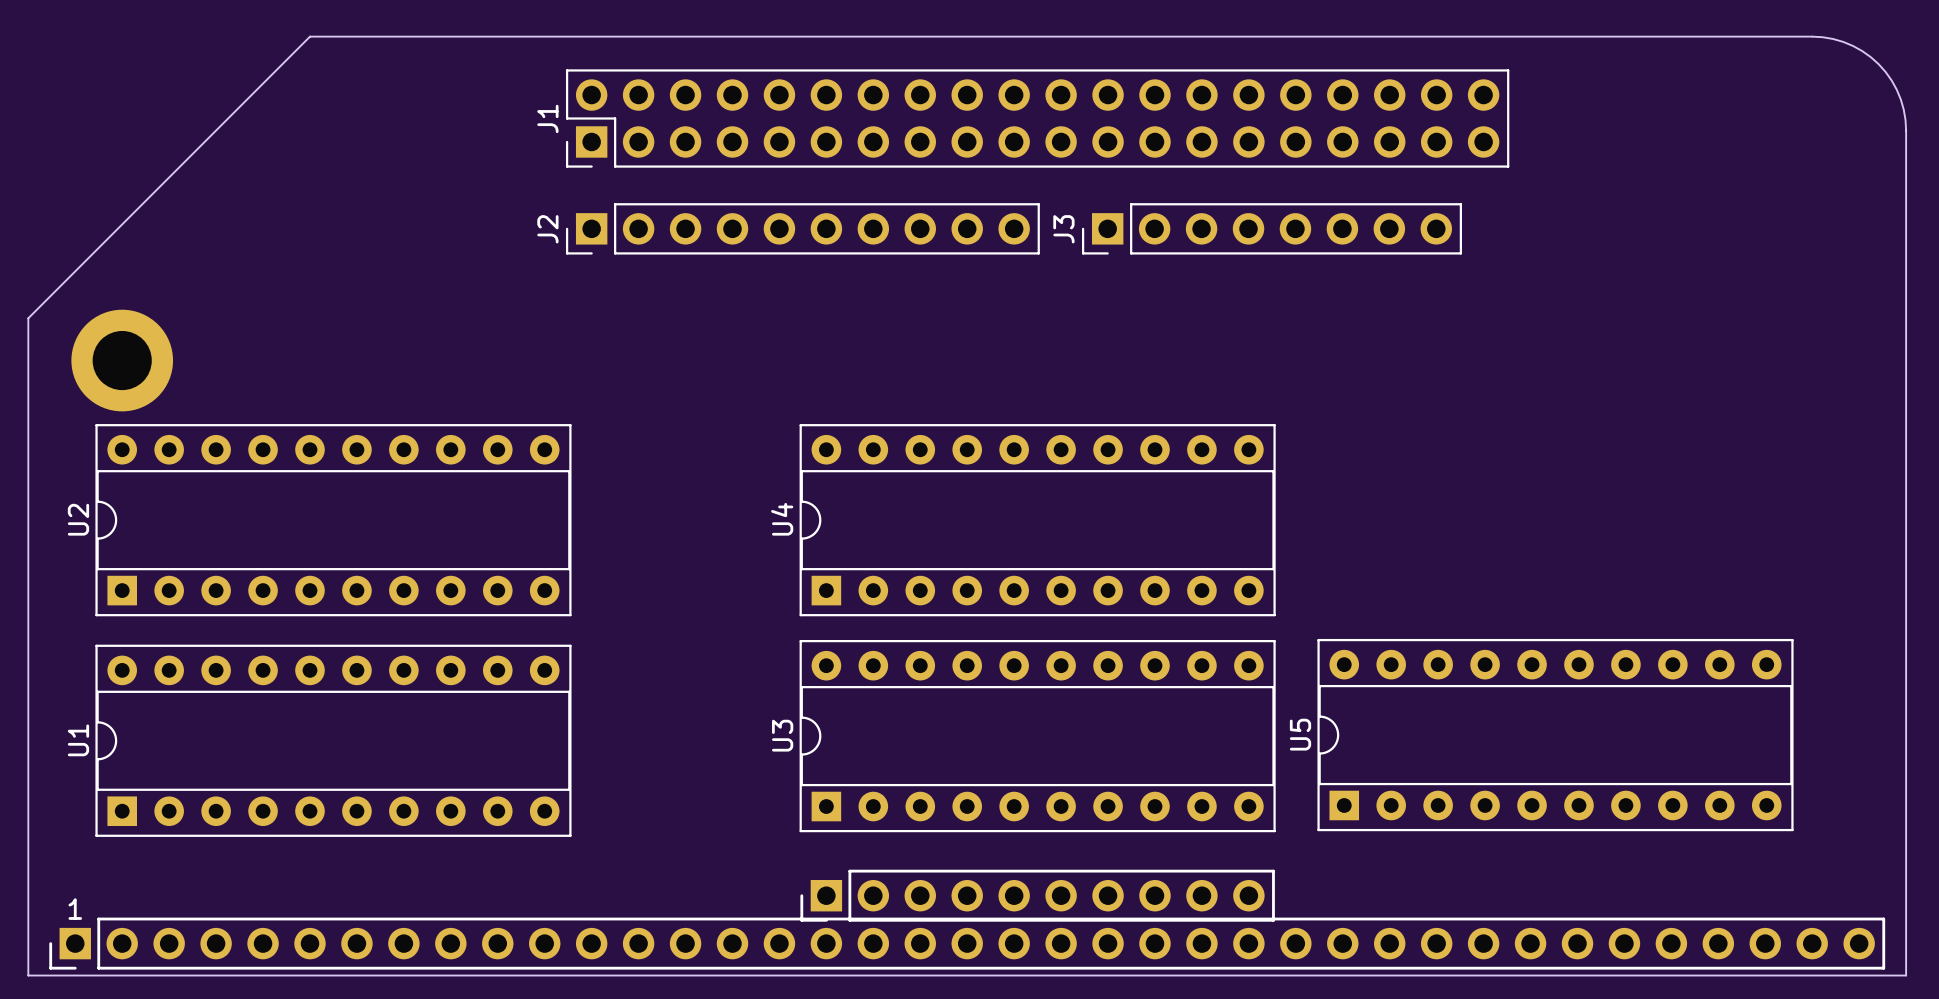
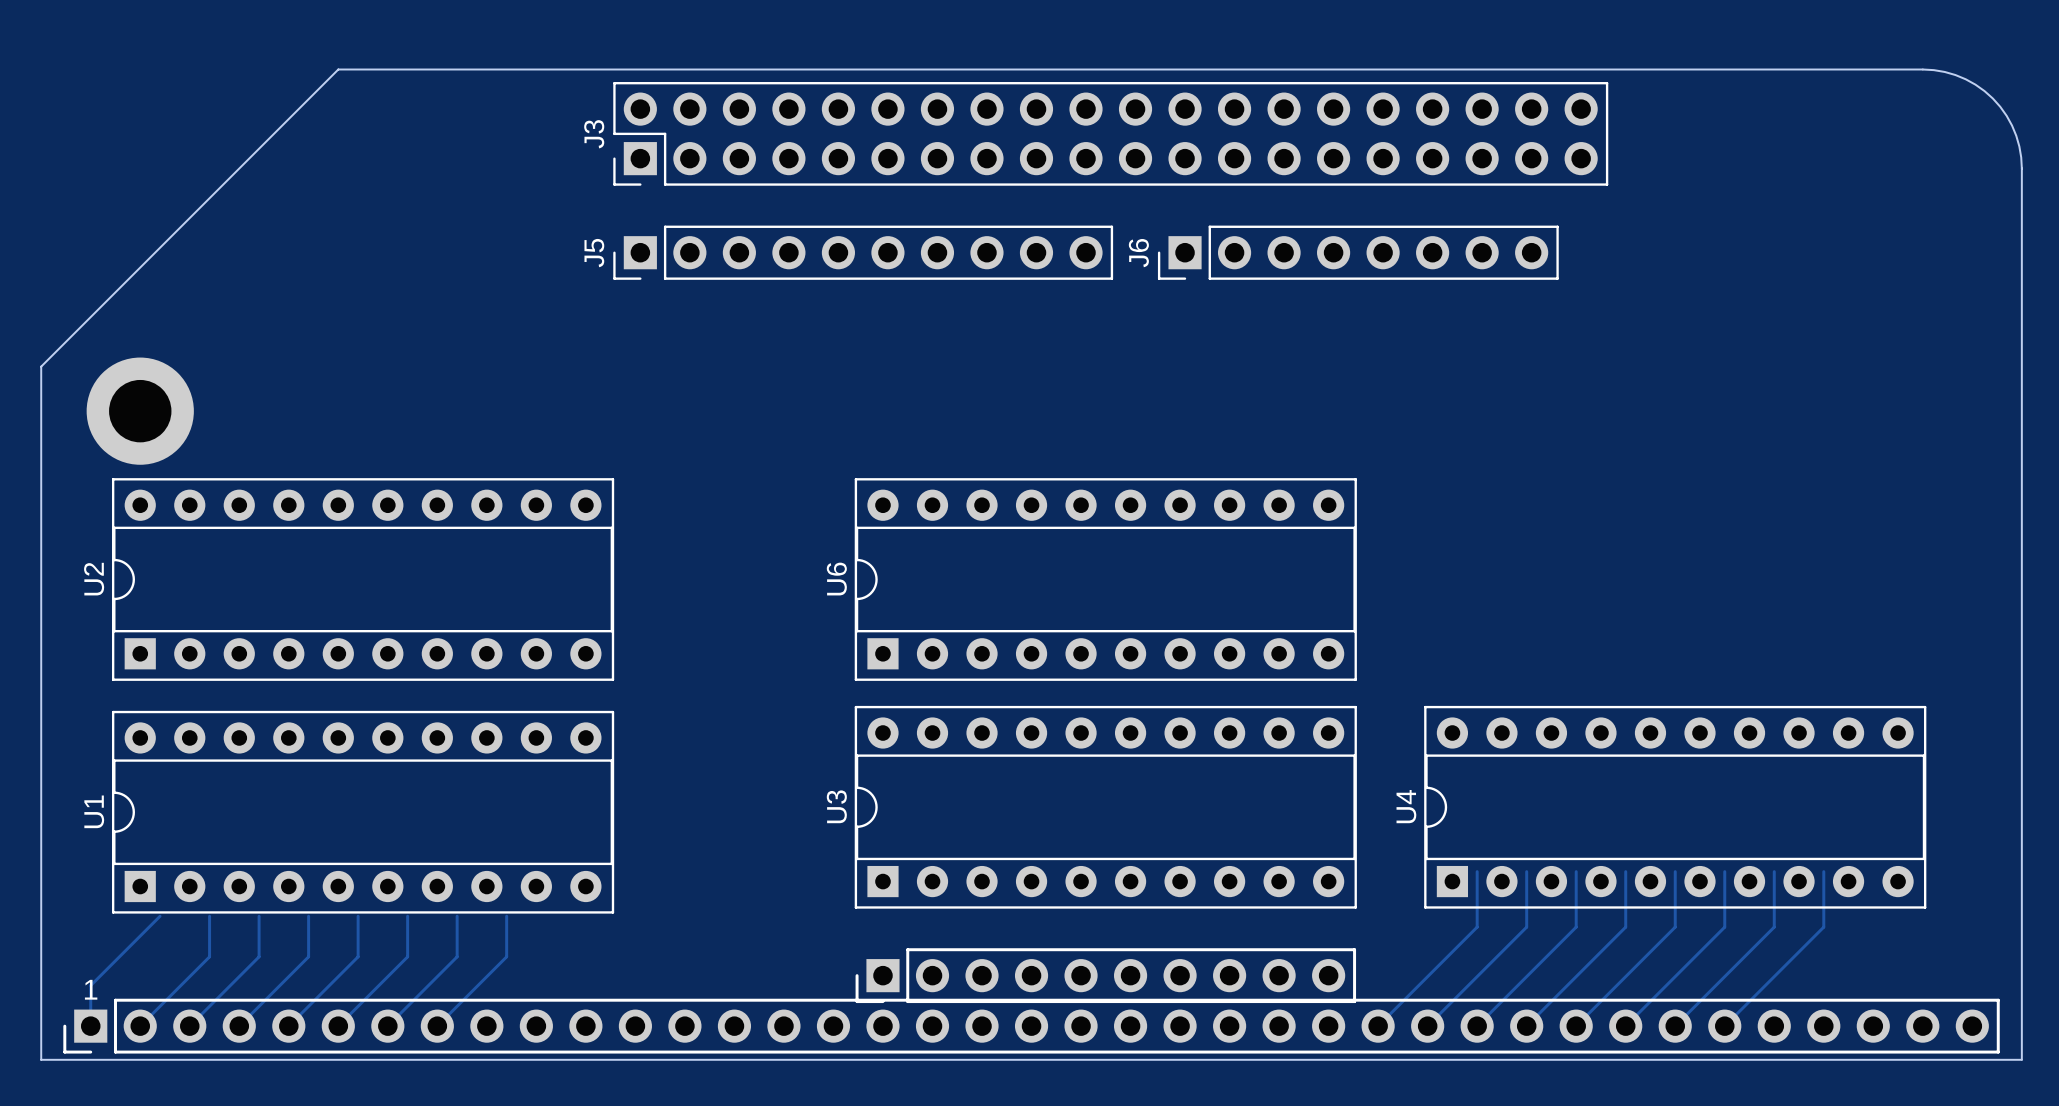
J1: (1037, 118) -> none
J3 footprint: [1081, 203, 1462, 255] -> [613, 82, 1609, 186]
J5: none -> (863, 252)
J6: none -> (1358, 252)
J2: (802, 228) -> none
J3 name position: J3 (1063, 229) -> J3 (594, 134)
U4 name: U4 (782, 519) -> U6 (836, 579)
U5: (1555, 735) -> none
U4: none -> (1675, 807)
track: none -> (1477, 871) (1477, 927) (1378, 1026)
track: none -> (1526, 871) (1526, 927) (1427, 1026)
track: none -> (1576, 871) (1576, 927) (1477, 1026)
track: none -> (1625, 871) (1625, 927) (1526, 1026)
track: none -> (1675, 871) (1675, 927) (1576, 1026)
track: none -> (1724, 871) (1724, 927) (1625, 1026)
track: none -> (1774, 871) (1774, 927) (1675, 1026)
track: none -> (1823, 871) (1823, 927) (1724, 1026)
track: none -> (160, 916) (90, 985) (90, 1026)
track: none -> (209, 916) (209, 956) (140, 1026)
track: none -> (259, 916) (259, 956) (189, 1026)
track: none -> (308, 916) (308, 956) (239, 1026)
track: none -> (358, 916) (358, 956) (288, 1026)
track: none -> (407, 916) (407, 956) (338, 1026)
track: none -> (457, 916) (457, 956) (387, 1026)
track: none -> (506, 916) (506, 956) (437, 1026)

